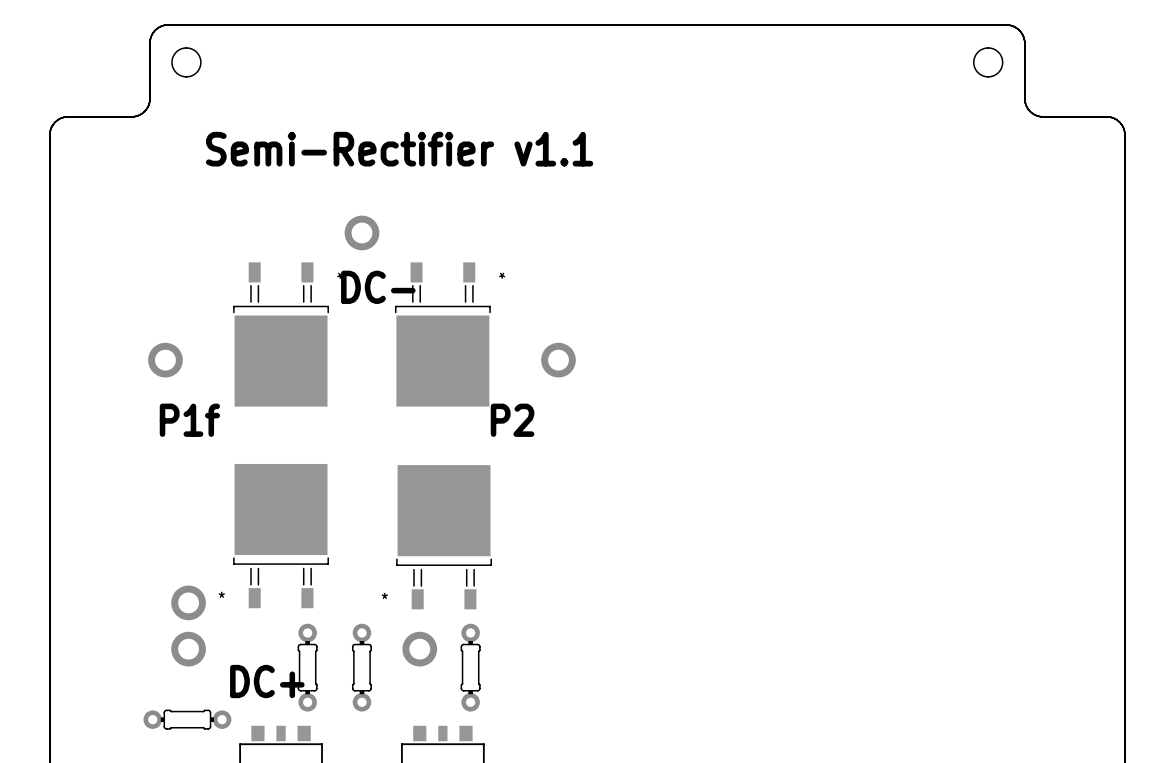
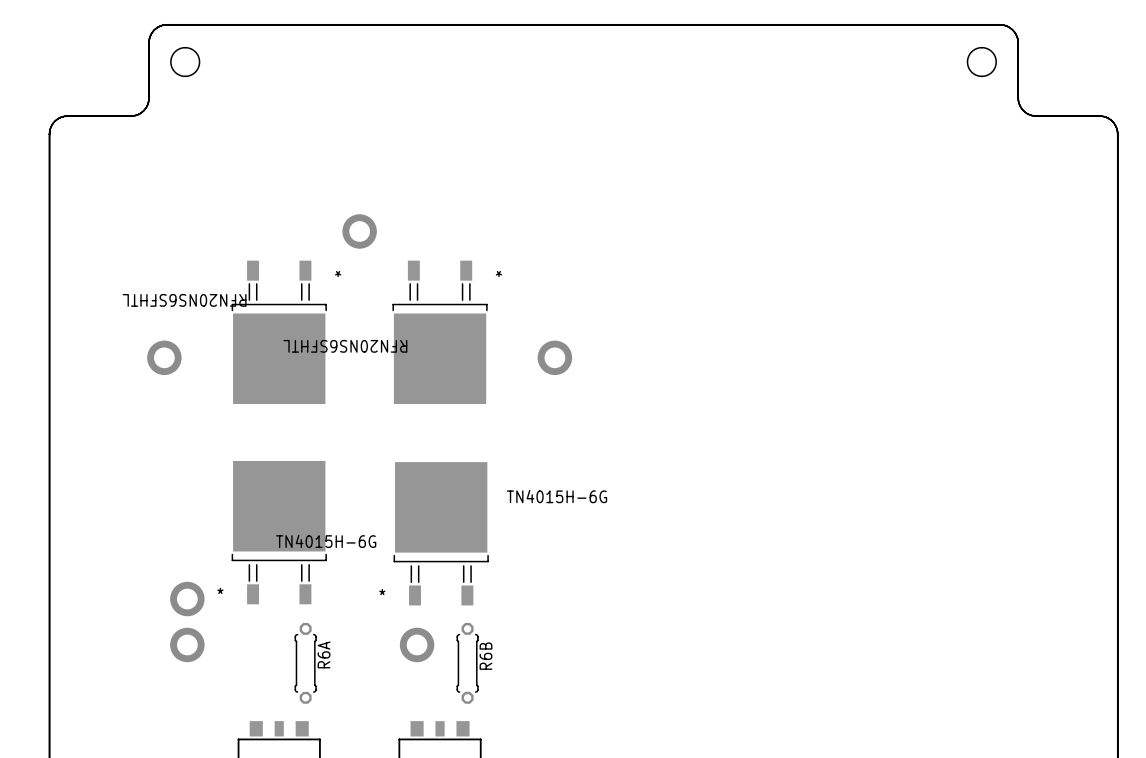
text: Semi-Rectifier v1.1 (399, 149) -> none
text: DC- (378, 287) -> none
part value: none -> RFN20NS6SFHTL (184, 300)
part value: none -> RFN20NS6SFHTL (345, 346)
text: P1f (189, 420) -> none
text: P2 (512, 420) -> none
part value: none -> TN4015H-6G (557, 496)
part value: none -> TN4015H-6G (326, 541)
part: (307, 667) -> none
R6A: none -> (305, 663)
part: (361, 667) -> none
part: (470, 667) -> none
R6B: none -> (467, 663)
text: DC+ (267, 681) -> none
part: (187, 719) -> none

